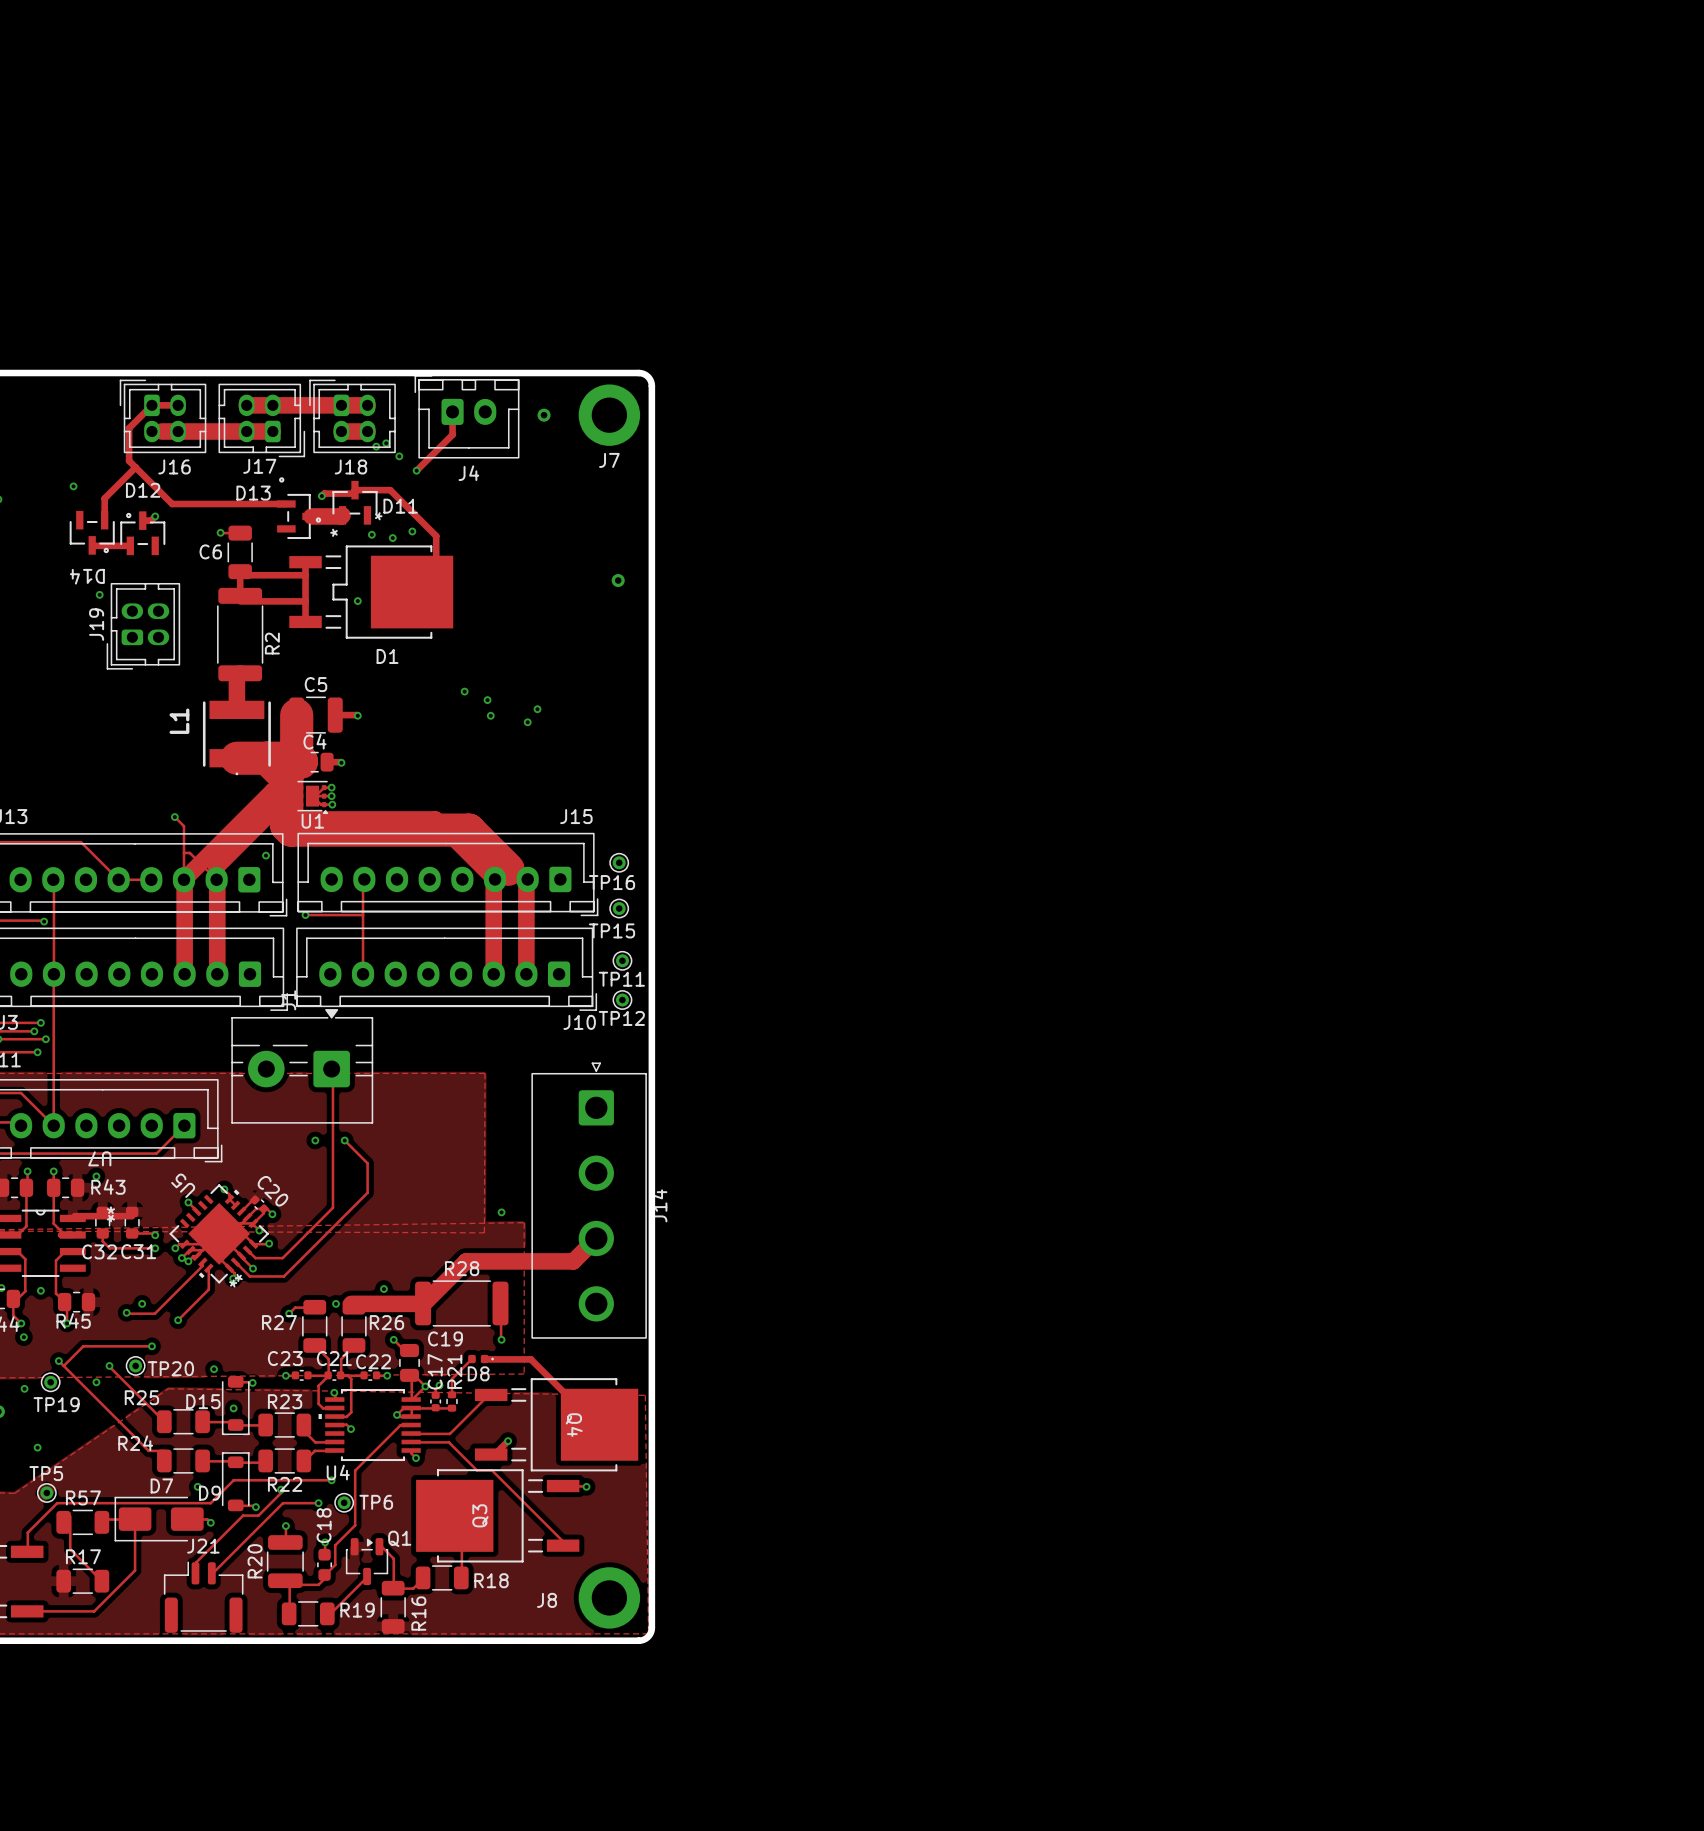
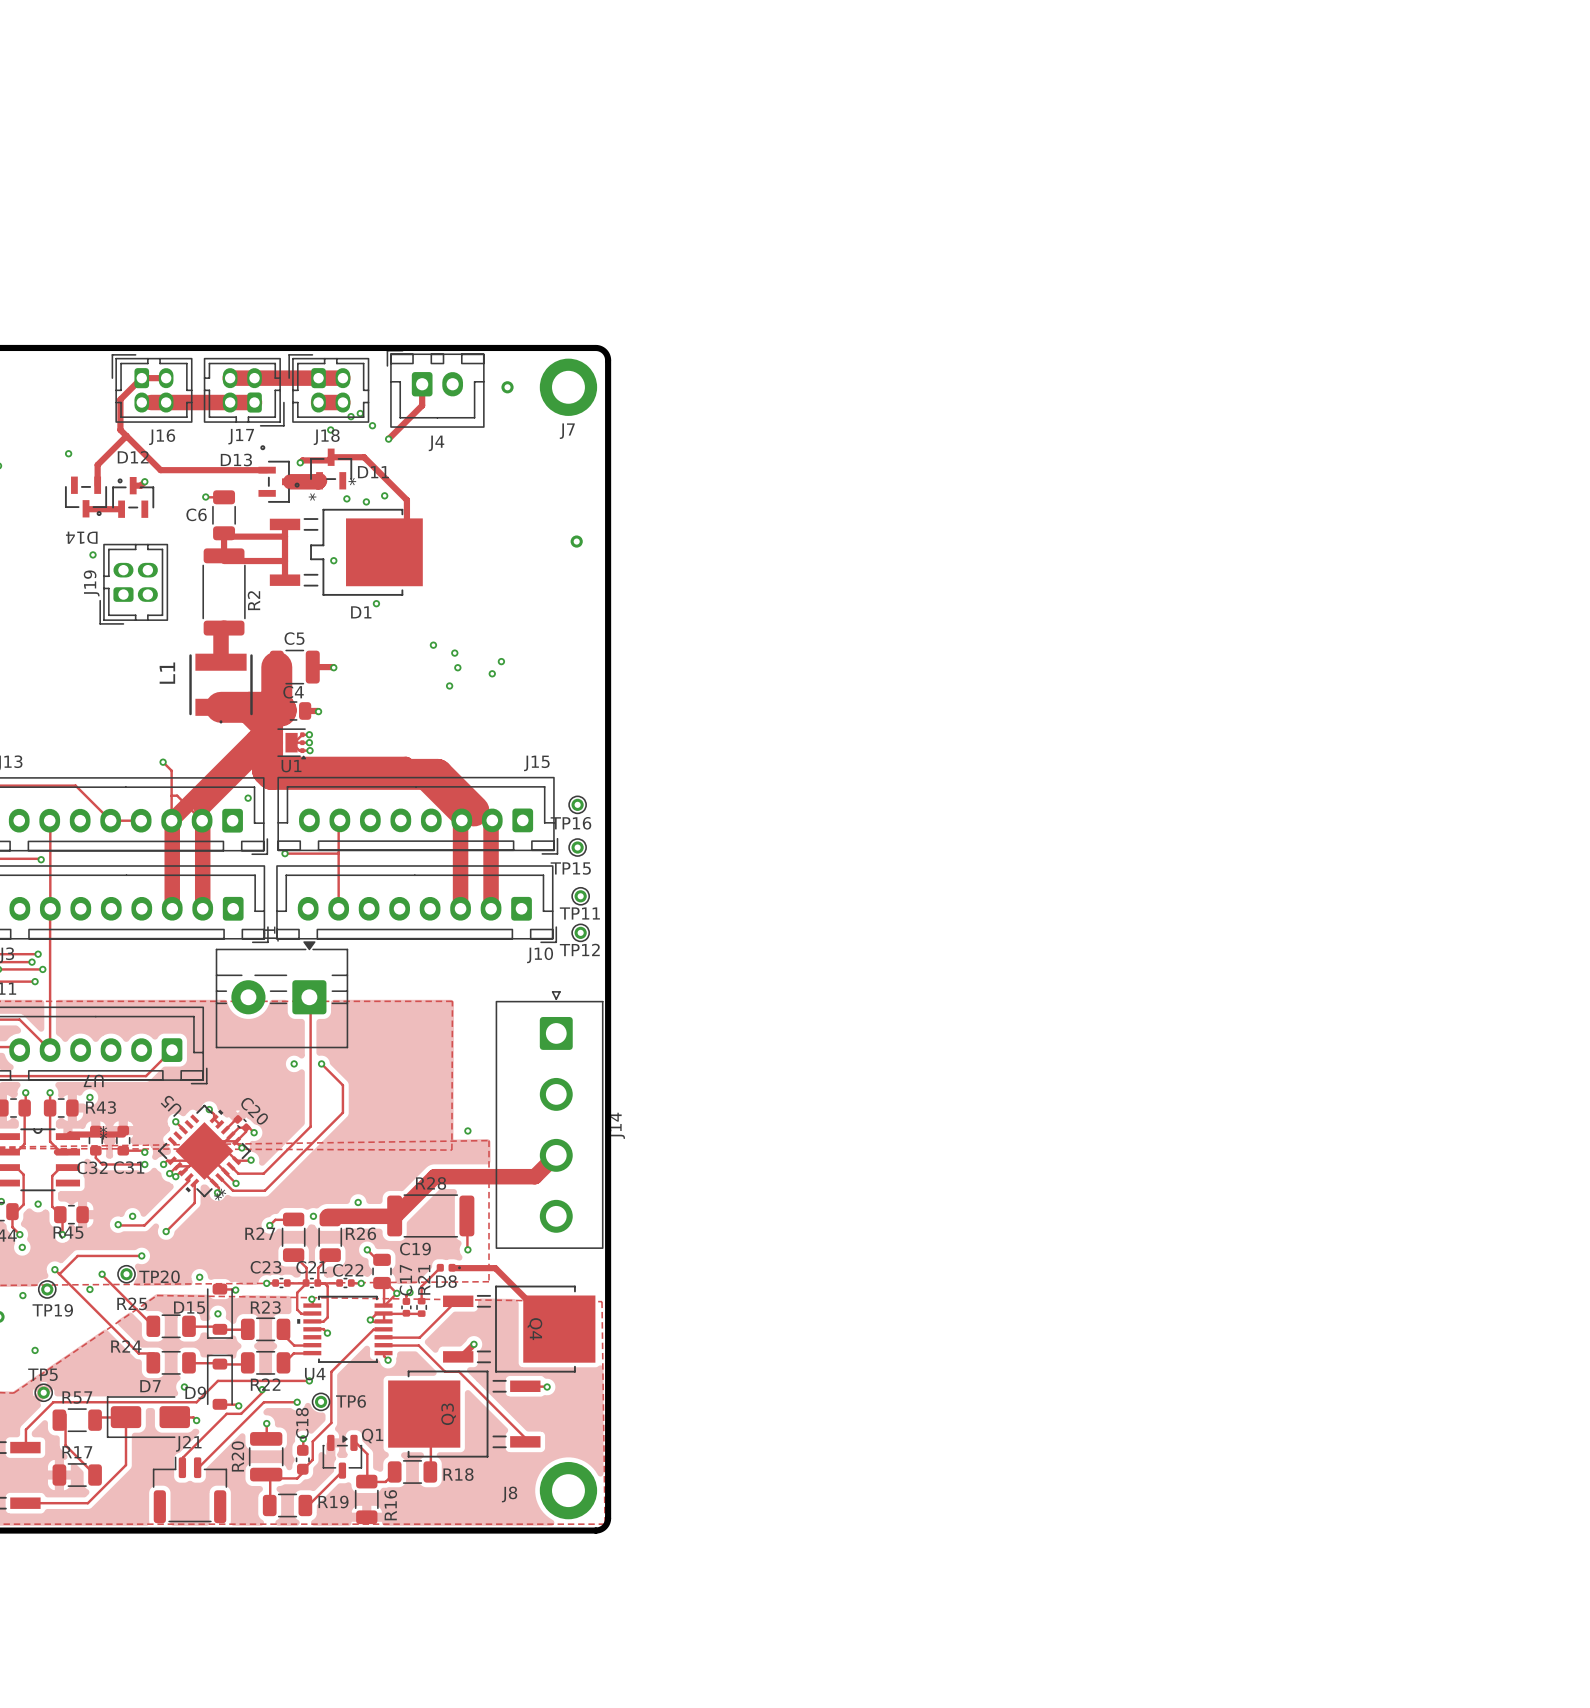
via: none -> (330, 429)
via: none -> (376, 603)
via: none -> (449, 685)

